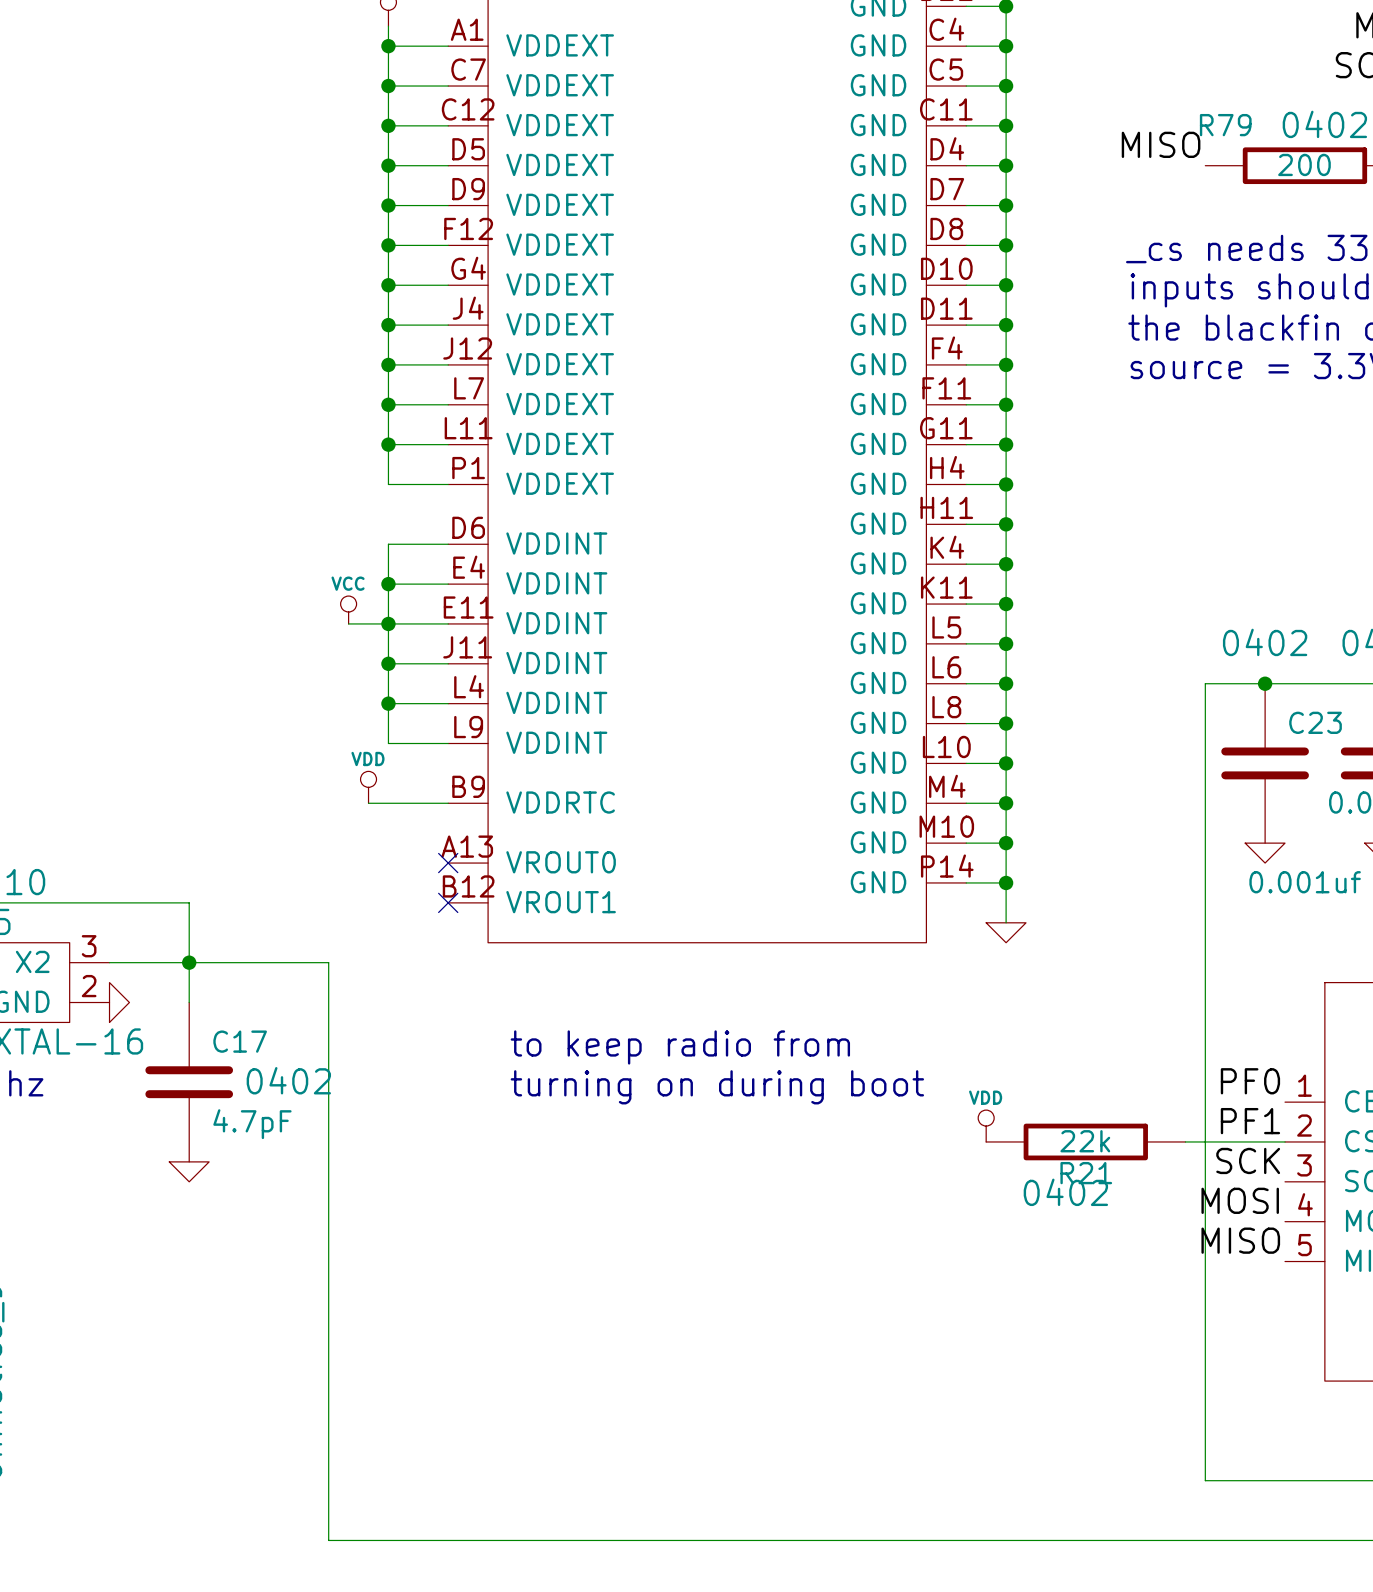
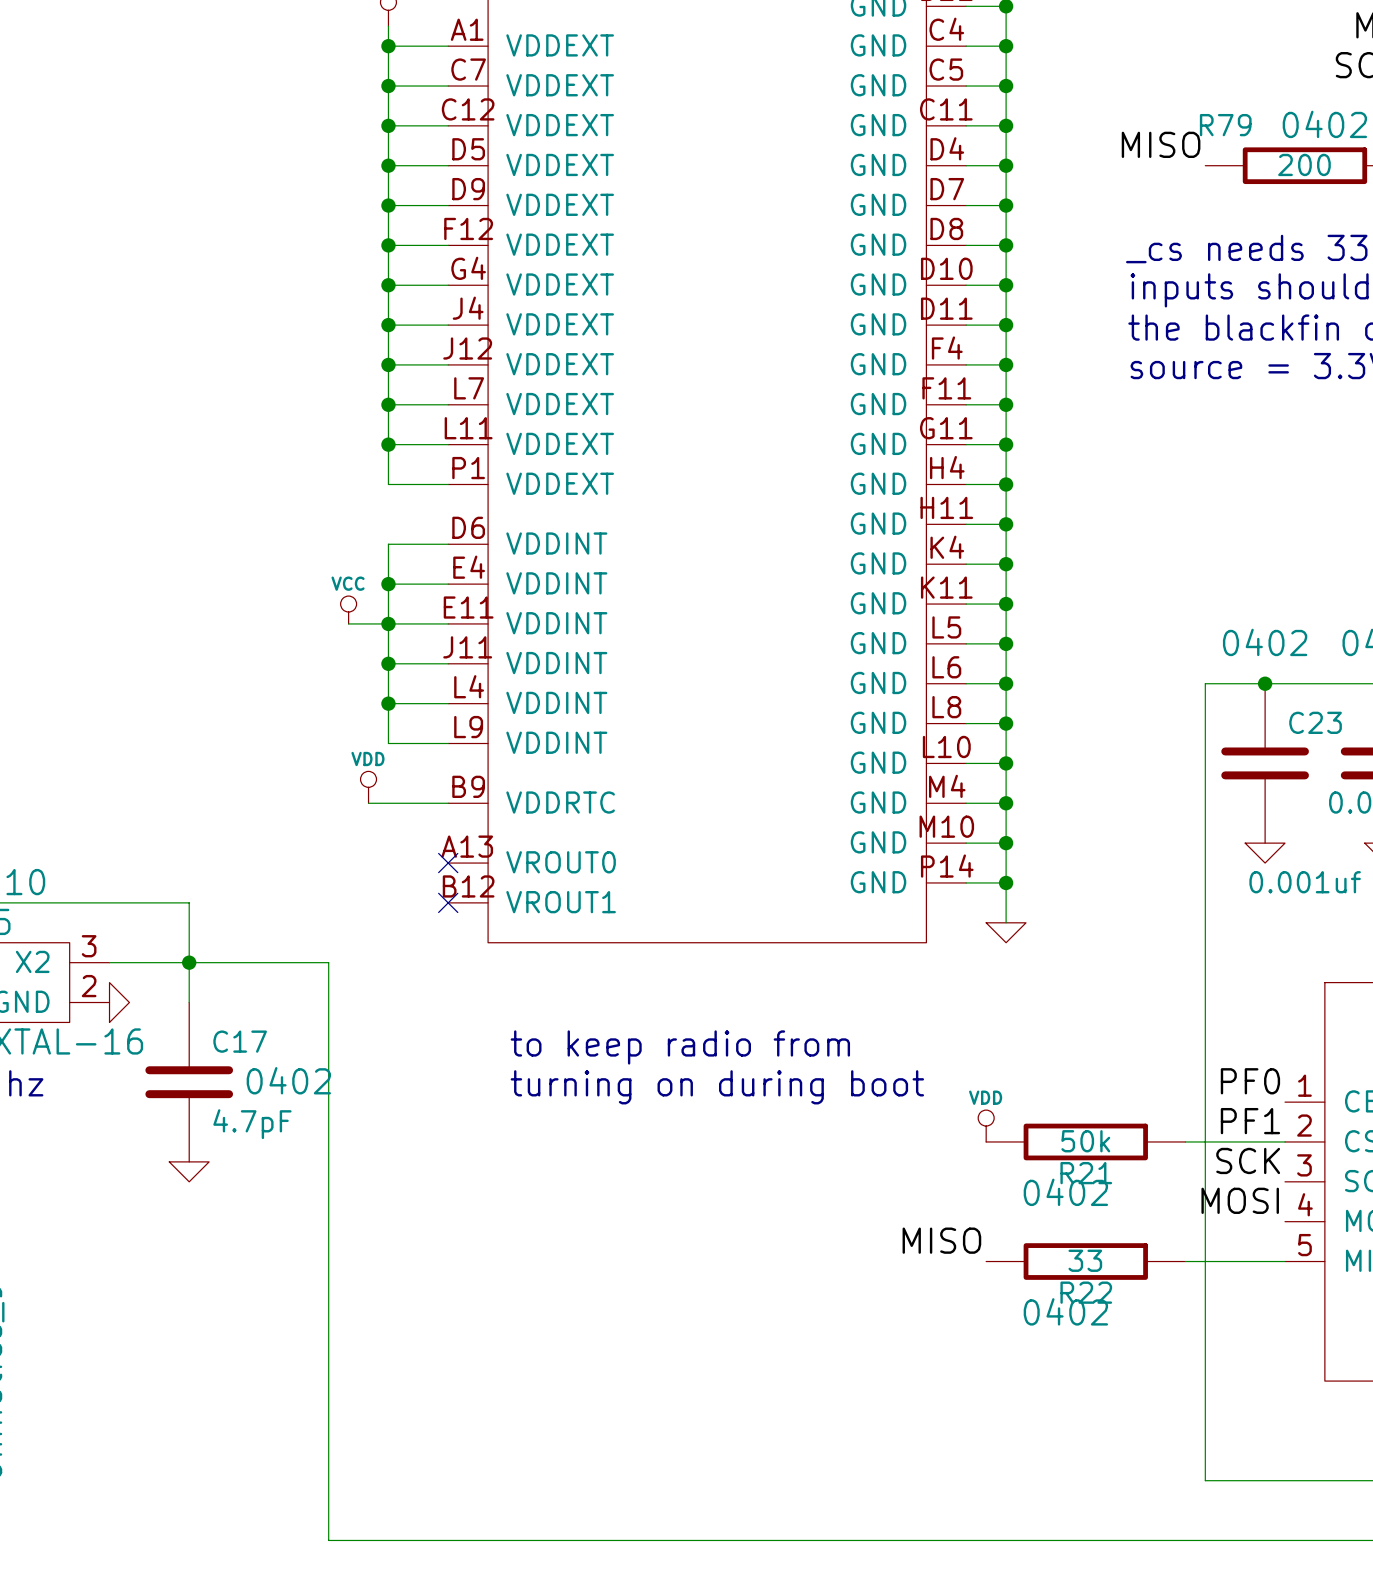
R21 value: 22k (1085, 1141) -> 50k (1085, 1141)
label position: MISO (1240, 1240) -> MISO (941, 1240)
R22: none -> 33 (1085, 1261)
wire: none -> (1185, 1261) (1285, 1261)

